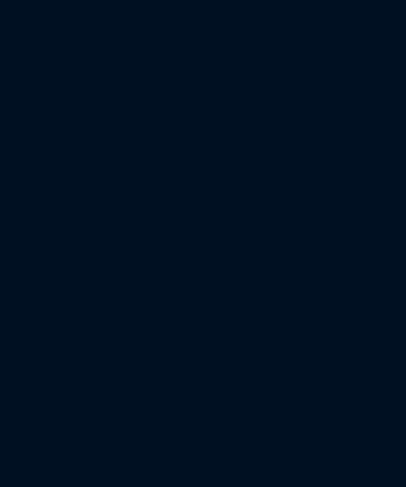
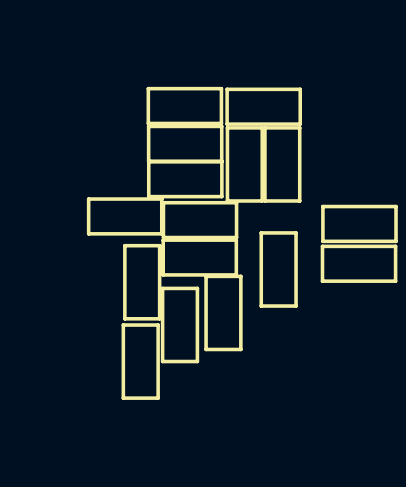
line: none -> (221, 88) (221, 123) (148, 123) (148, 88) (221, 88)
line: none -> (300, 89) (300, 124) (227, 124) (227, 89) (300, 89)
line: none -> (221, 126) (221, 161) (148, 161) (148, 126) (221, 126)
line: none -> (262, 127) (262, 200) (227, 200) (227, 127) (262, 127)
line: none -> (299, 127) (264, 127) (264, 200) (299, 200) (299, 127)
line: none -> (221, 161) (221, 196) (148, 196) (148, 161) (221, 161)
line: none -> (161, 199) (161, 233) (88, 233) (88, 199) (161, 199)
line: none -> (236, 202) (236, 237) (163, 237) (163, 202) (236, 202)
line: none -> (396, 206) (322, 206) (322, 241) (396, 241) (396, 206)
line: none -> (296, 232) (296, 306) (261, 306) (261, 232) (296, 232)
line: none -> (236, 240) (236, 274) (163, 274) (163, 240) (236, 240)
line: none -> (159, 245) (159, 318) (124, 318) (124, 245) (159, 245)
line: none -> (395, 246) (395, 281) (322, 281) (322, 246) (395, 246)
line: none -> (240, 276) (240, 349) (206, 349) (206, 276) (240, 276)
line: none -> (197, 288) (197, 361) (162, 361) (162, 288) (197, 288)
line: none -> (158, 325) (123, 325) (123, 398) (158, 398) (158, 325)

